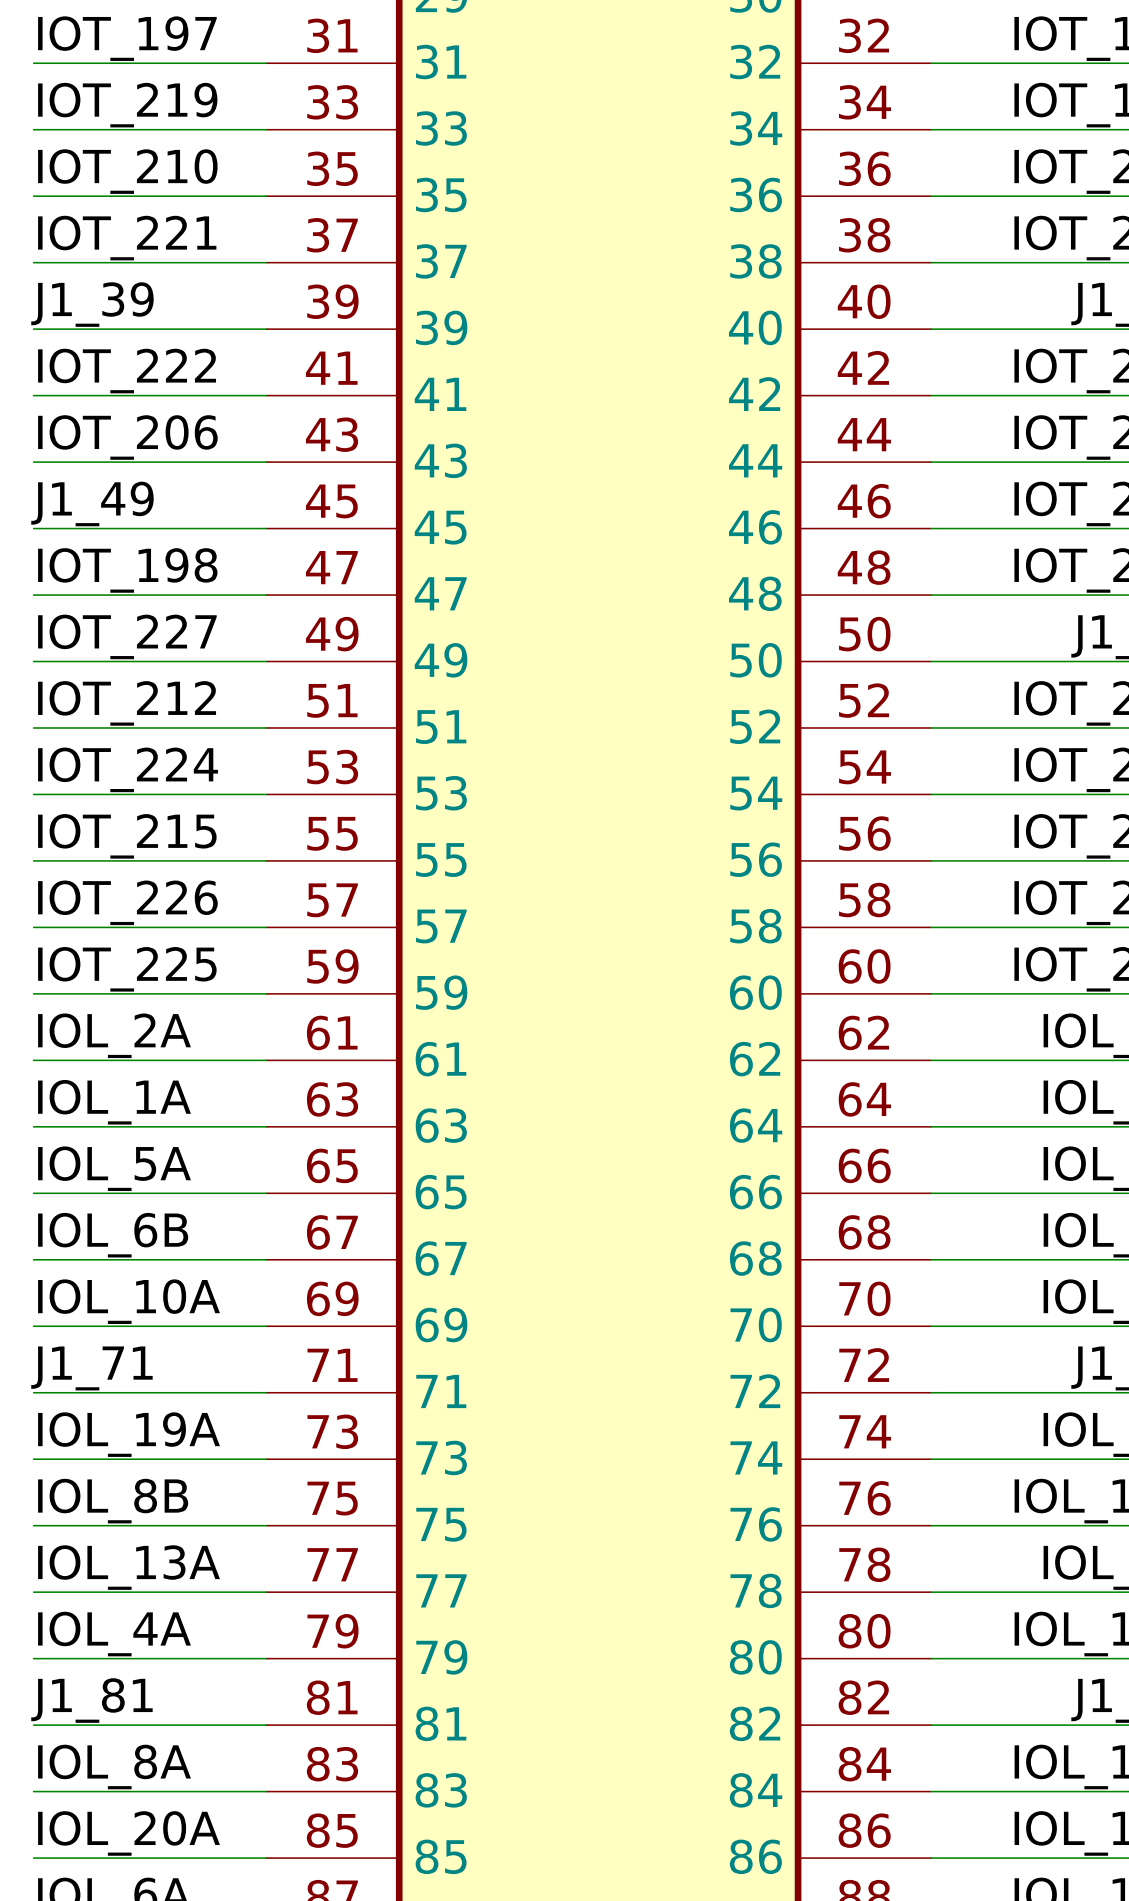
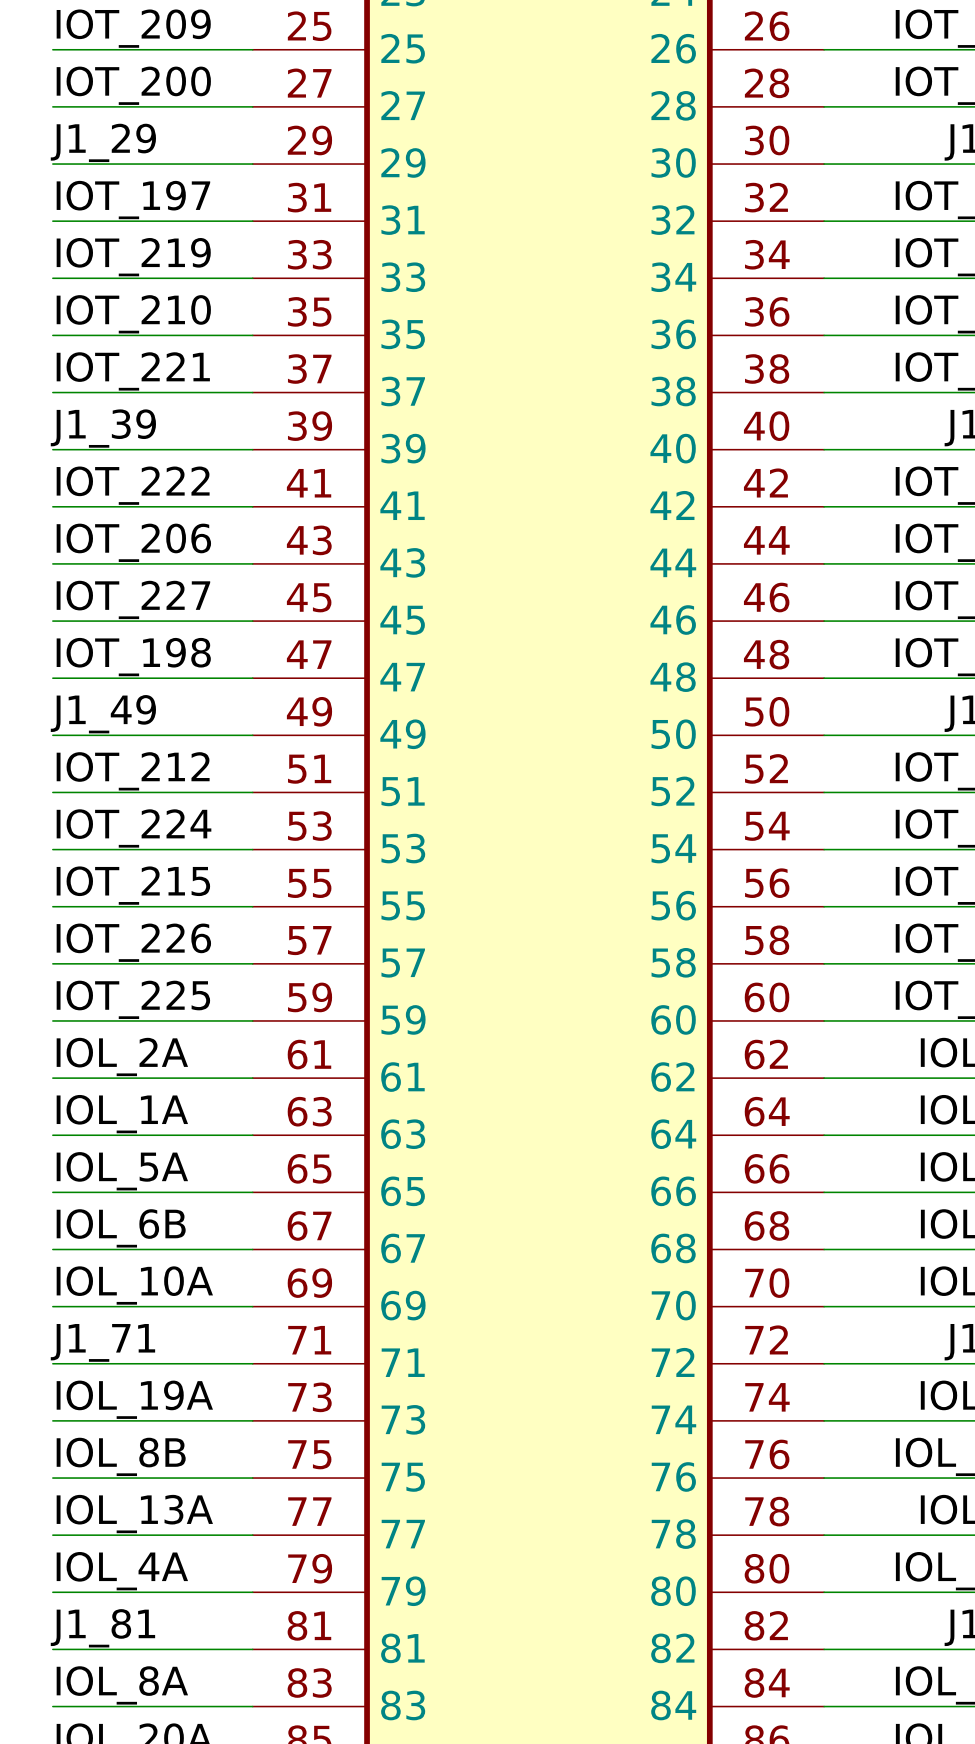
label: J1_49 (92, 503) -> IOT_227 (133, 599)
label: IOT_227 (127, 636) -> J1_49 (103, 714)

